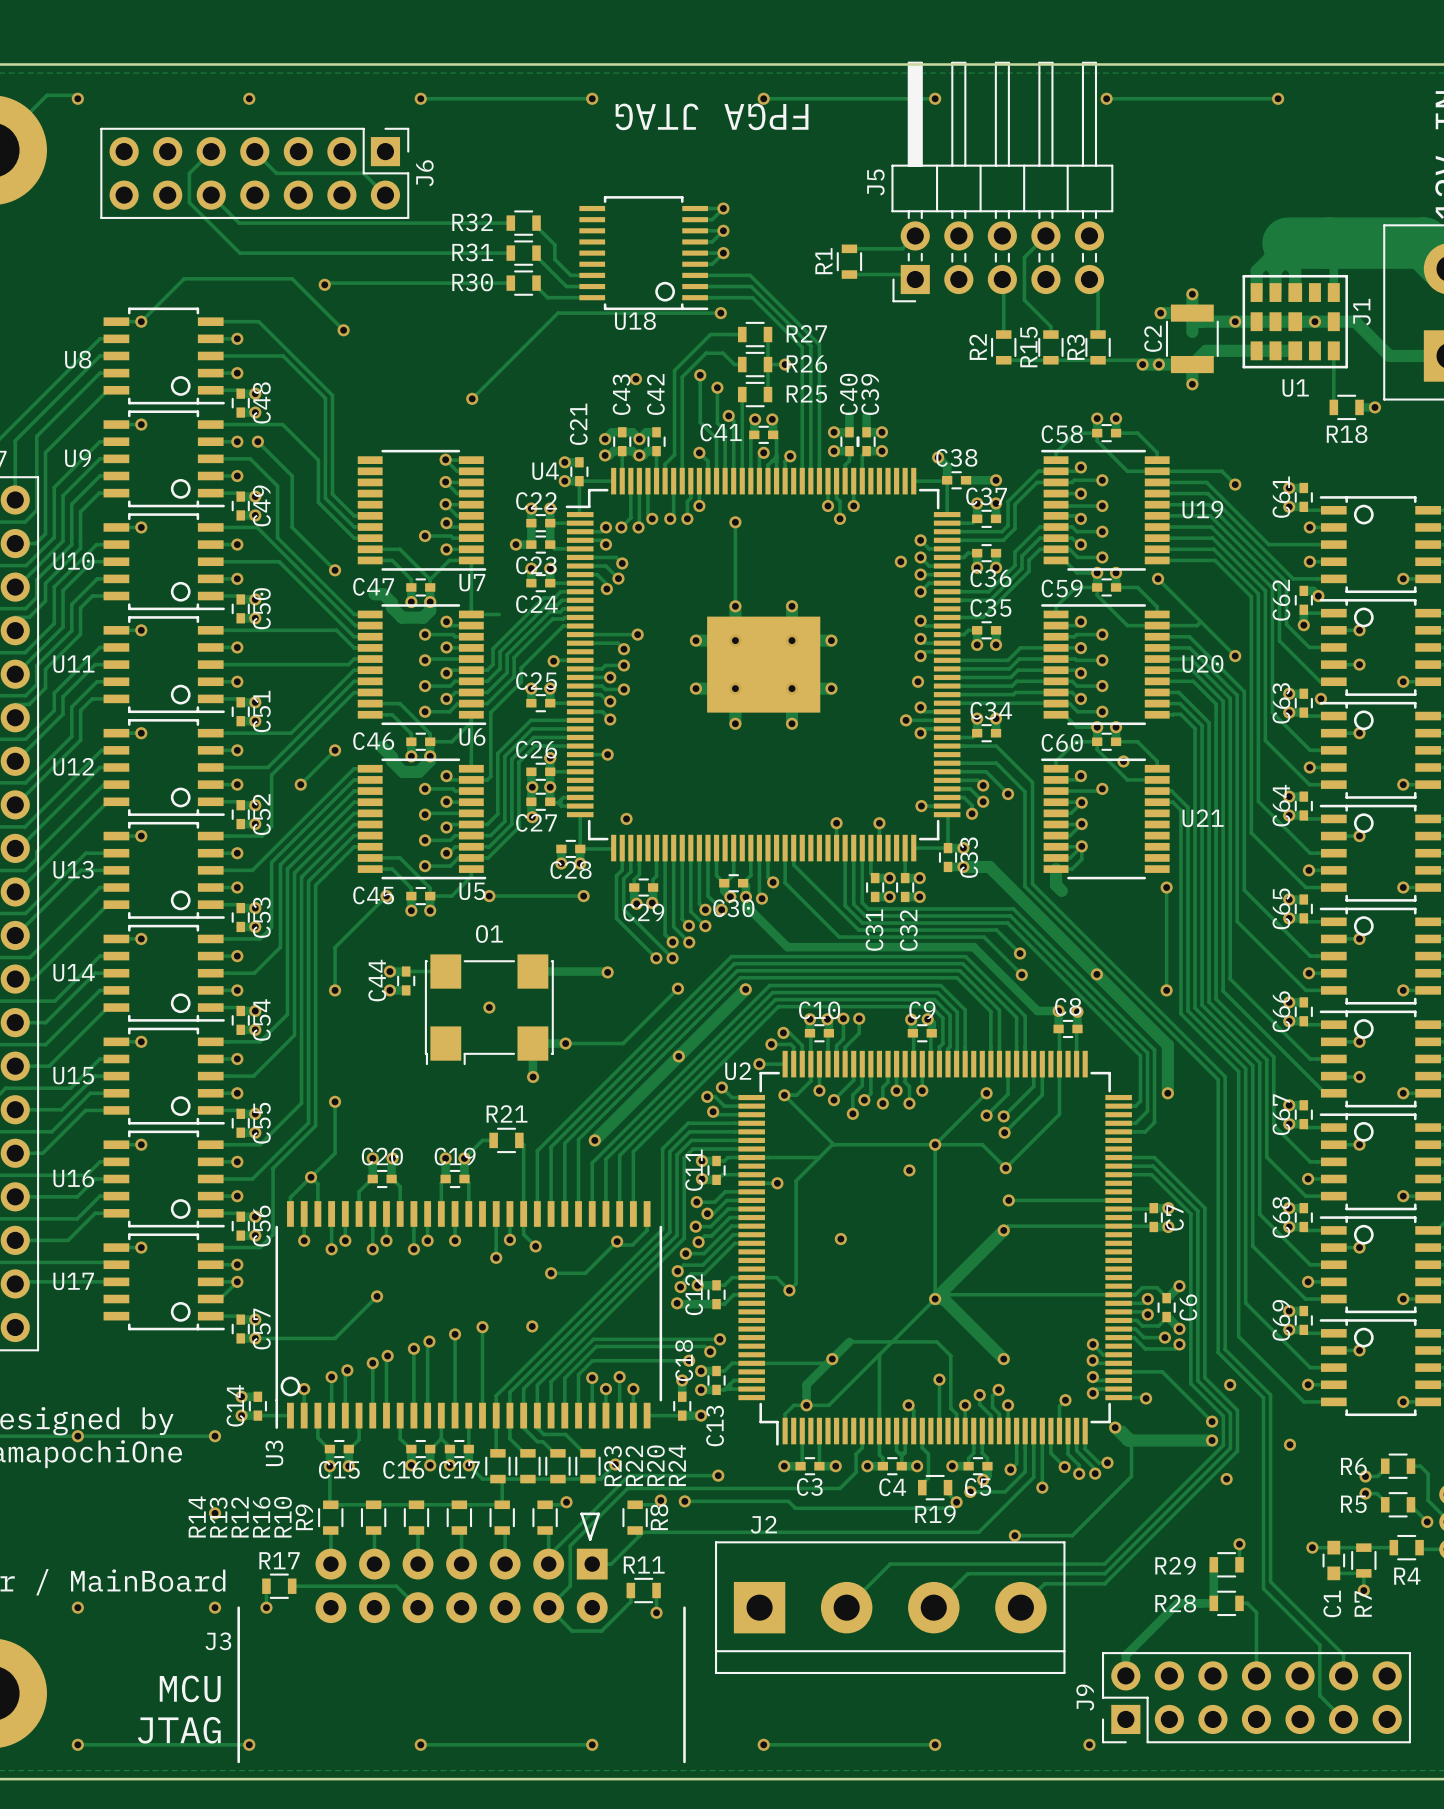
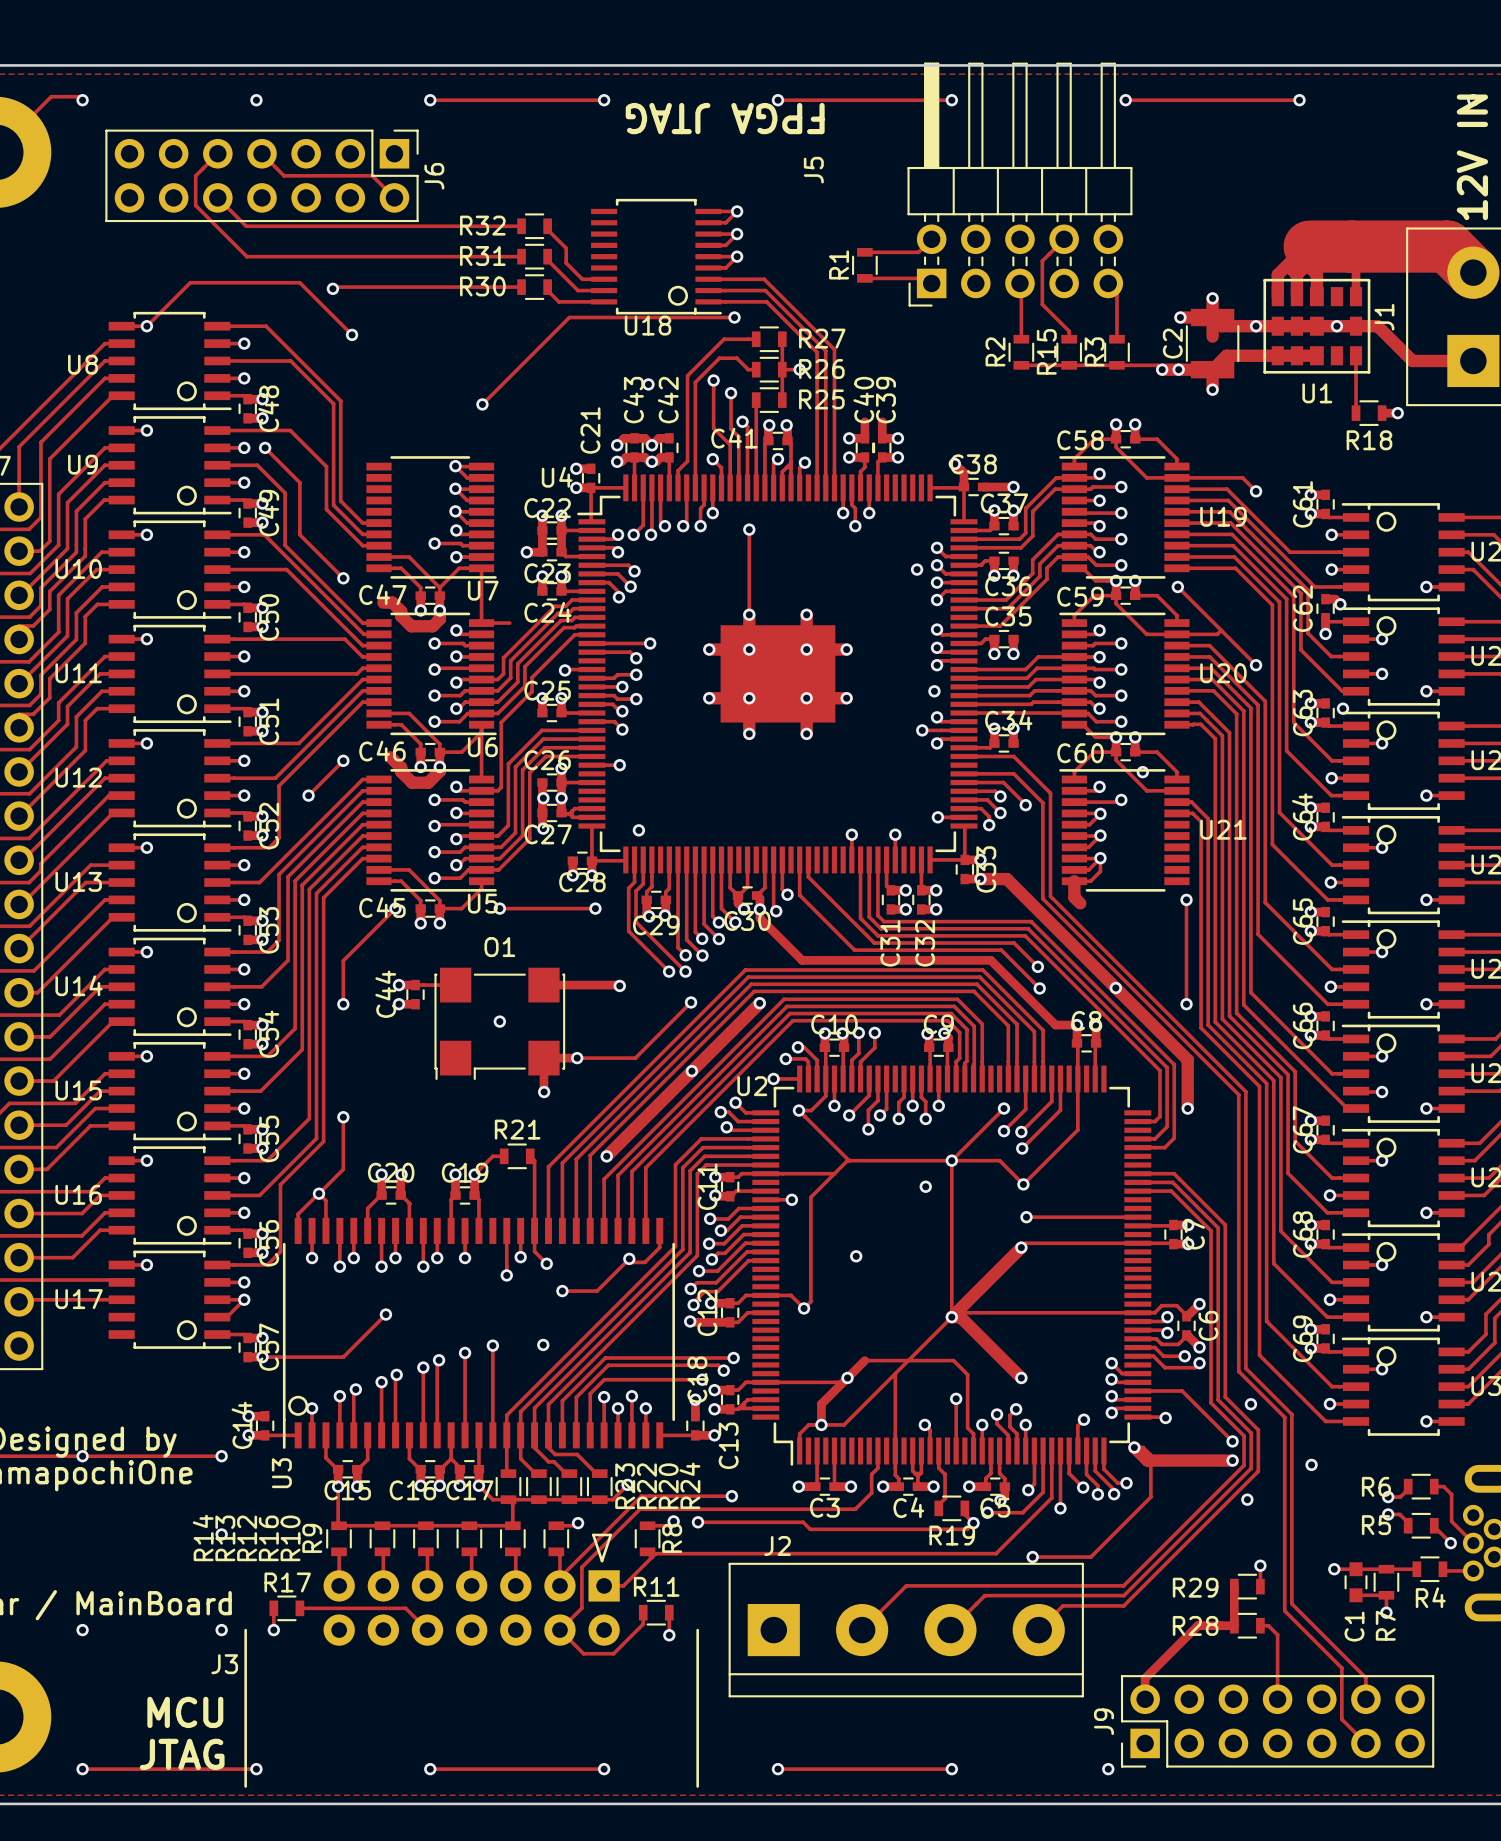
J5 name position: J5 (875, 182) -> J5 (813, 170)

